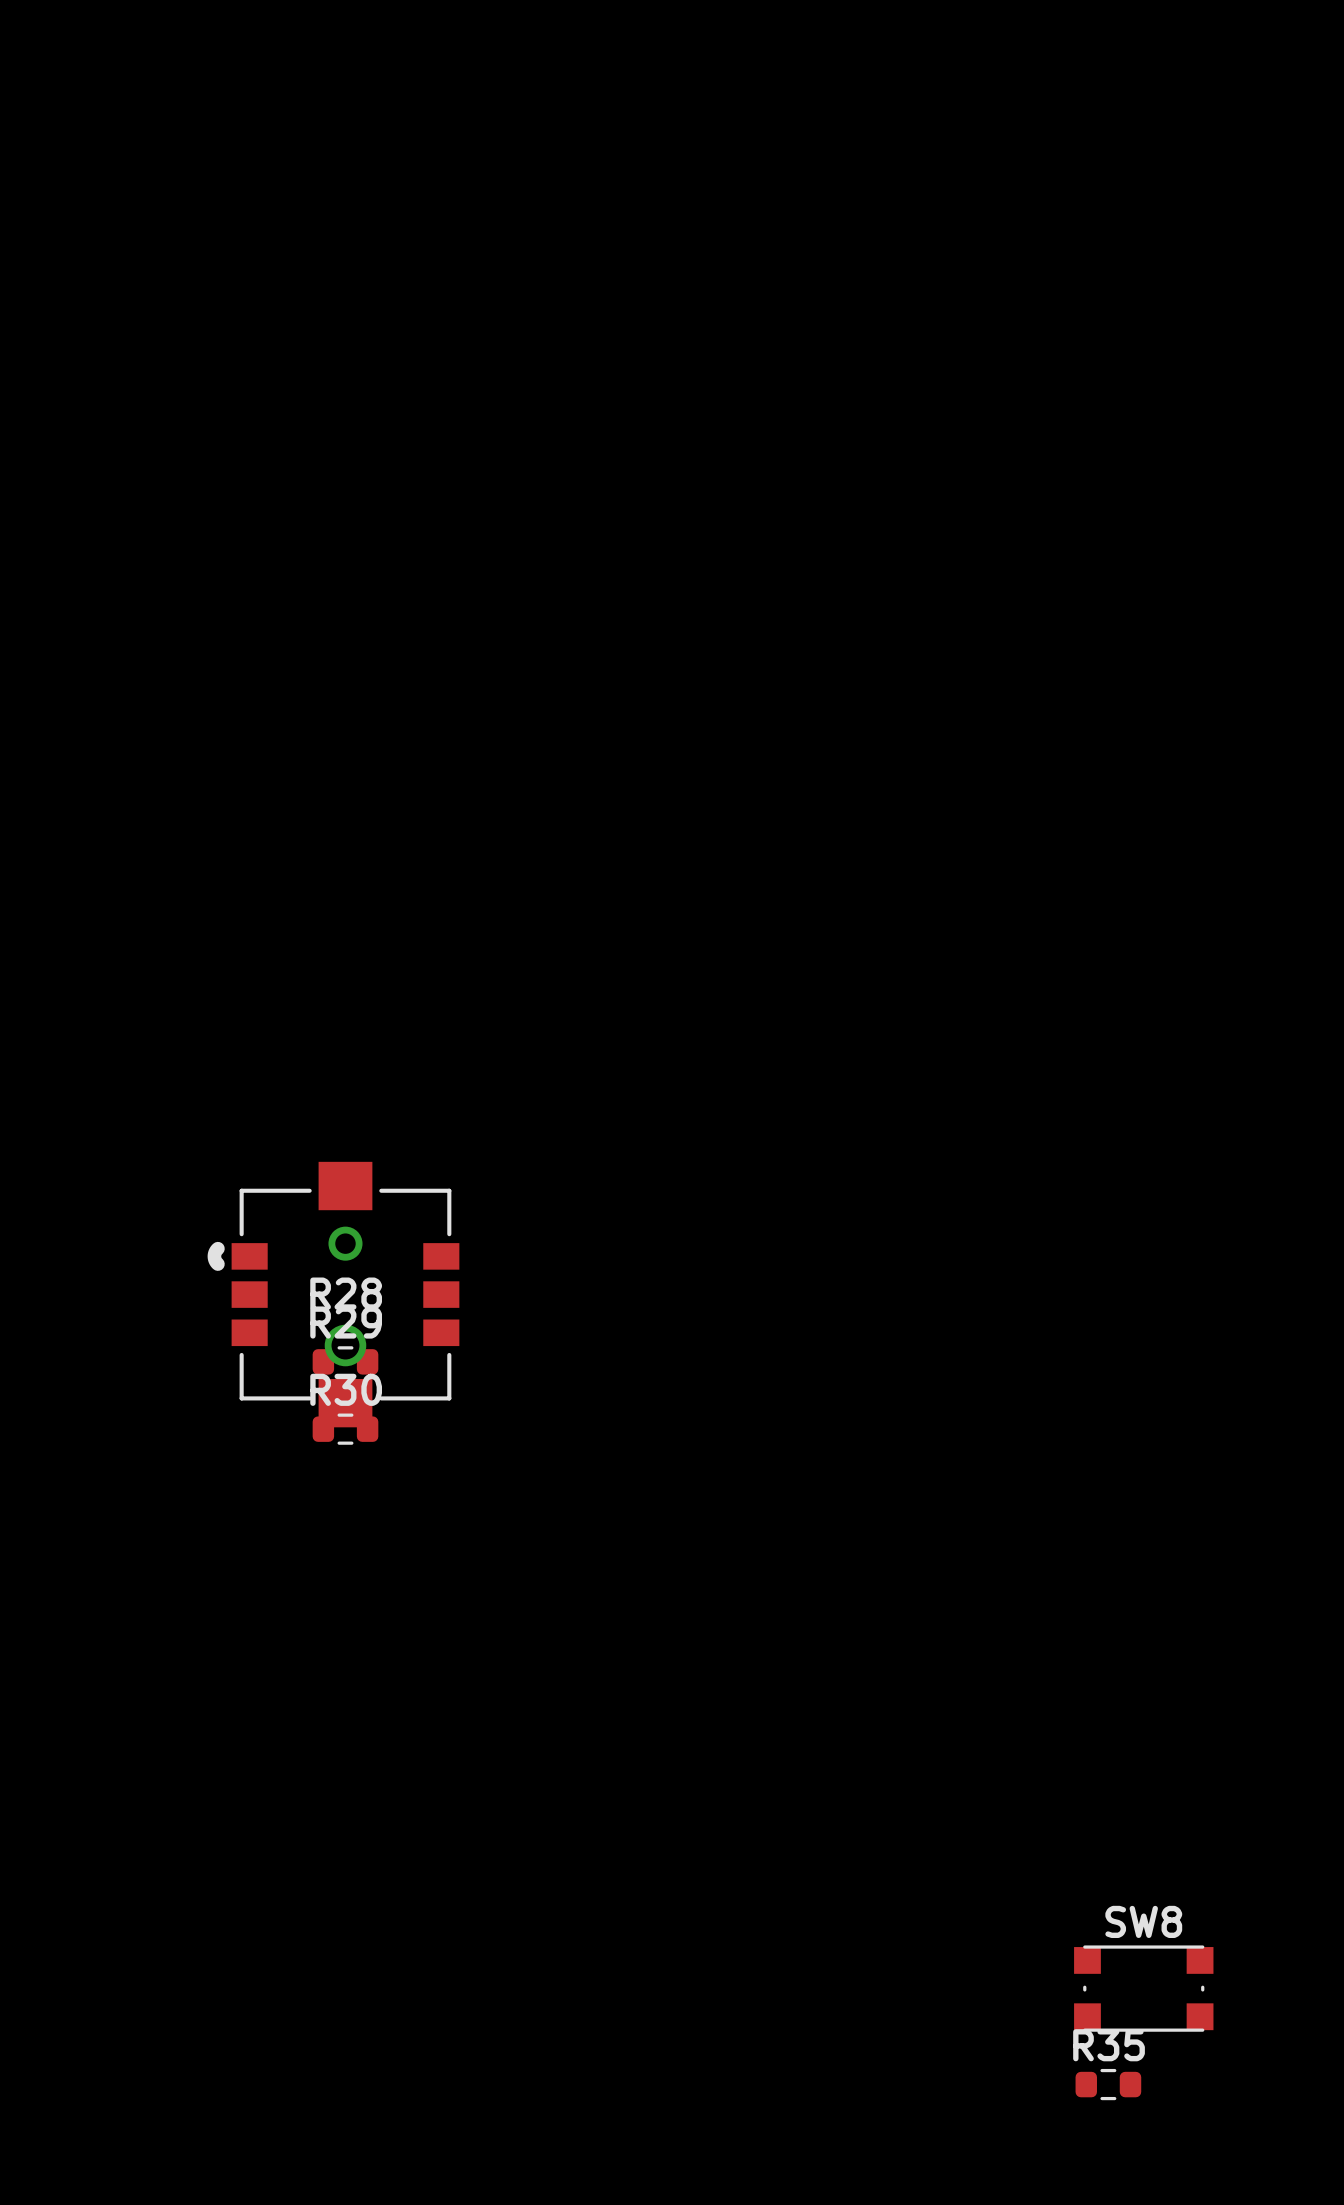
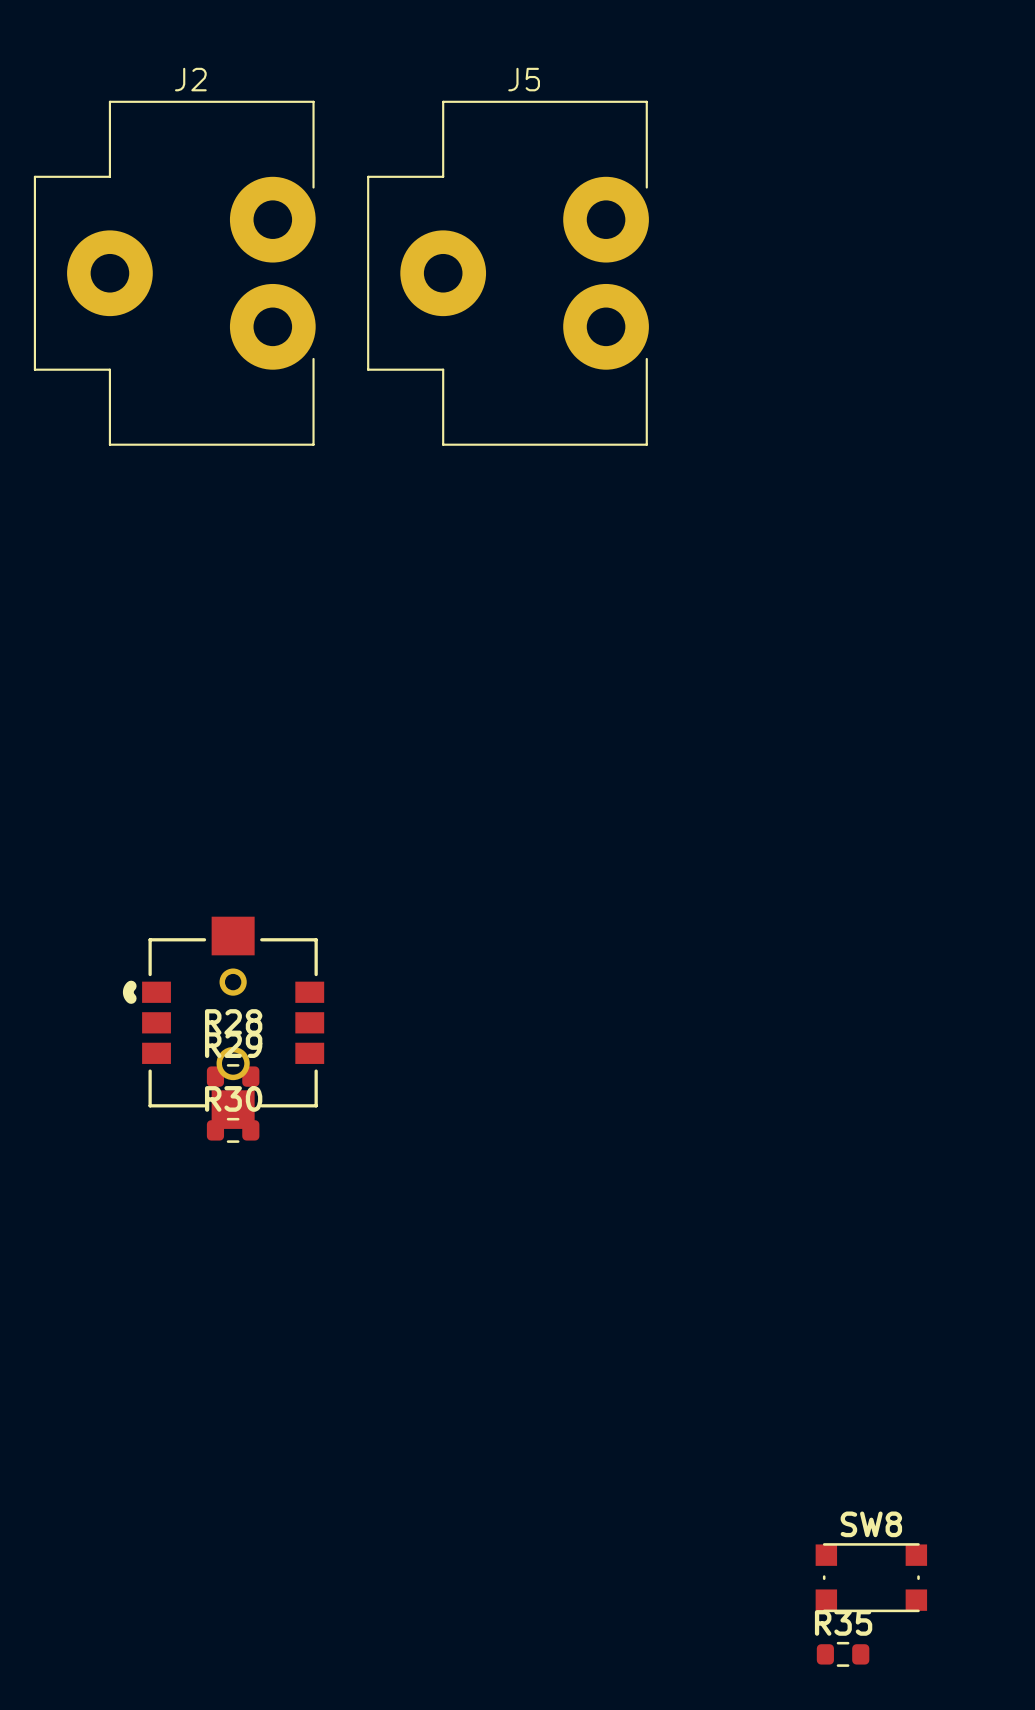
J2: none -> (174, 273)
J5: none -> (508, 273)

